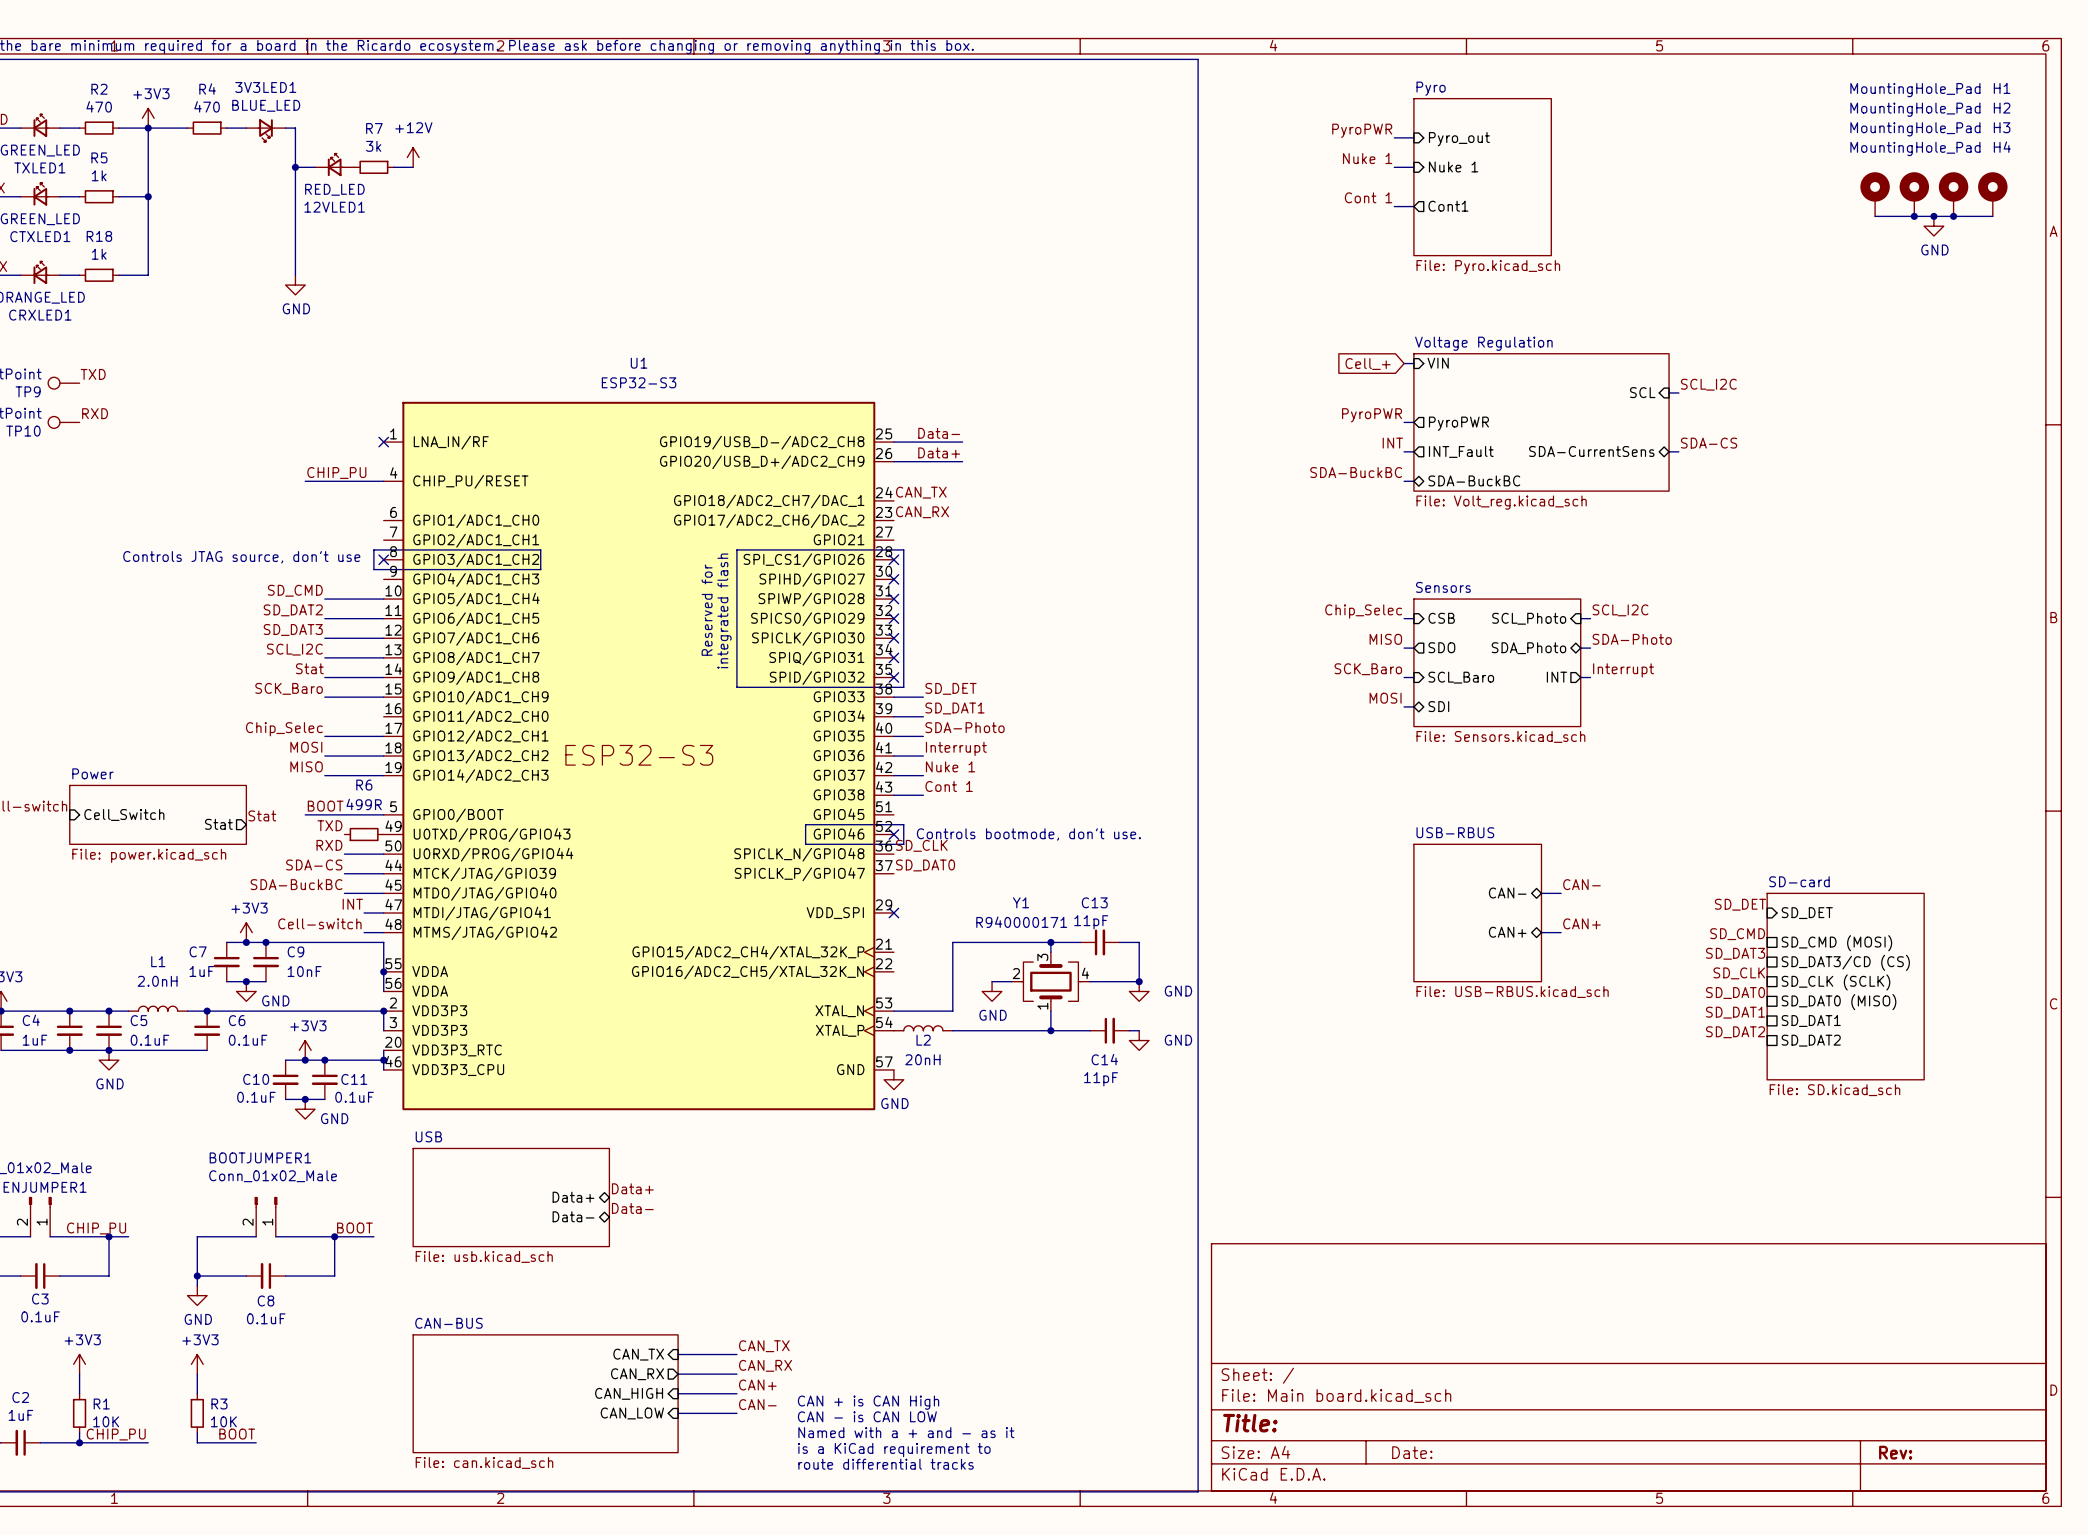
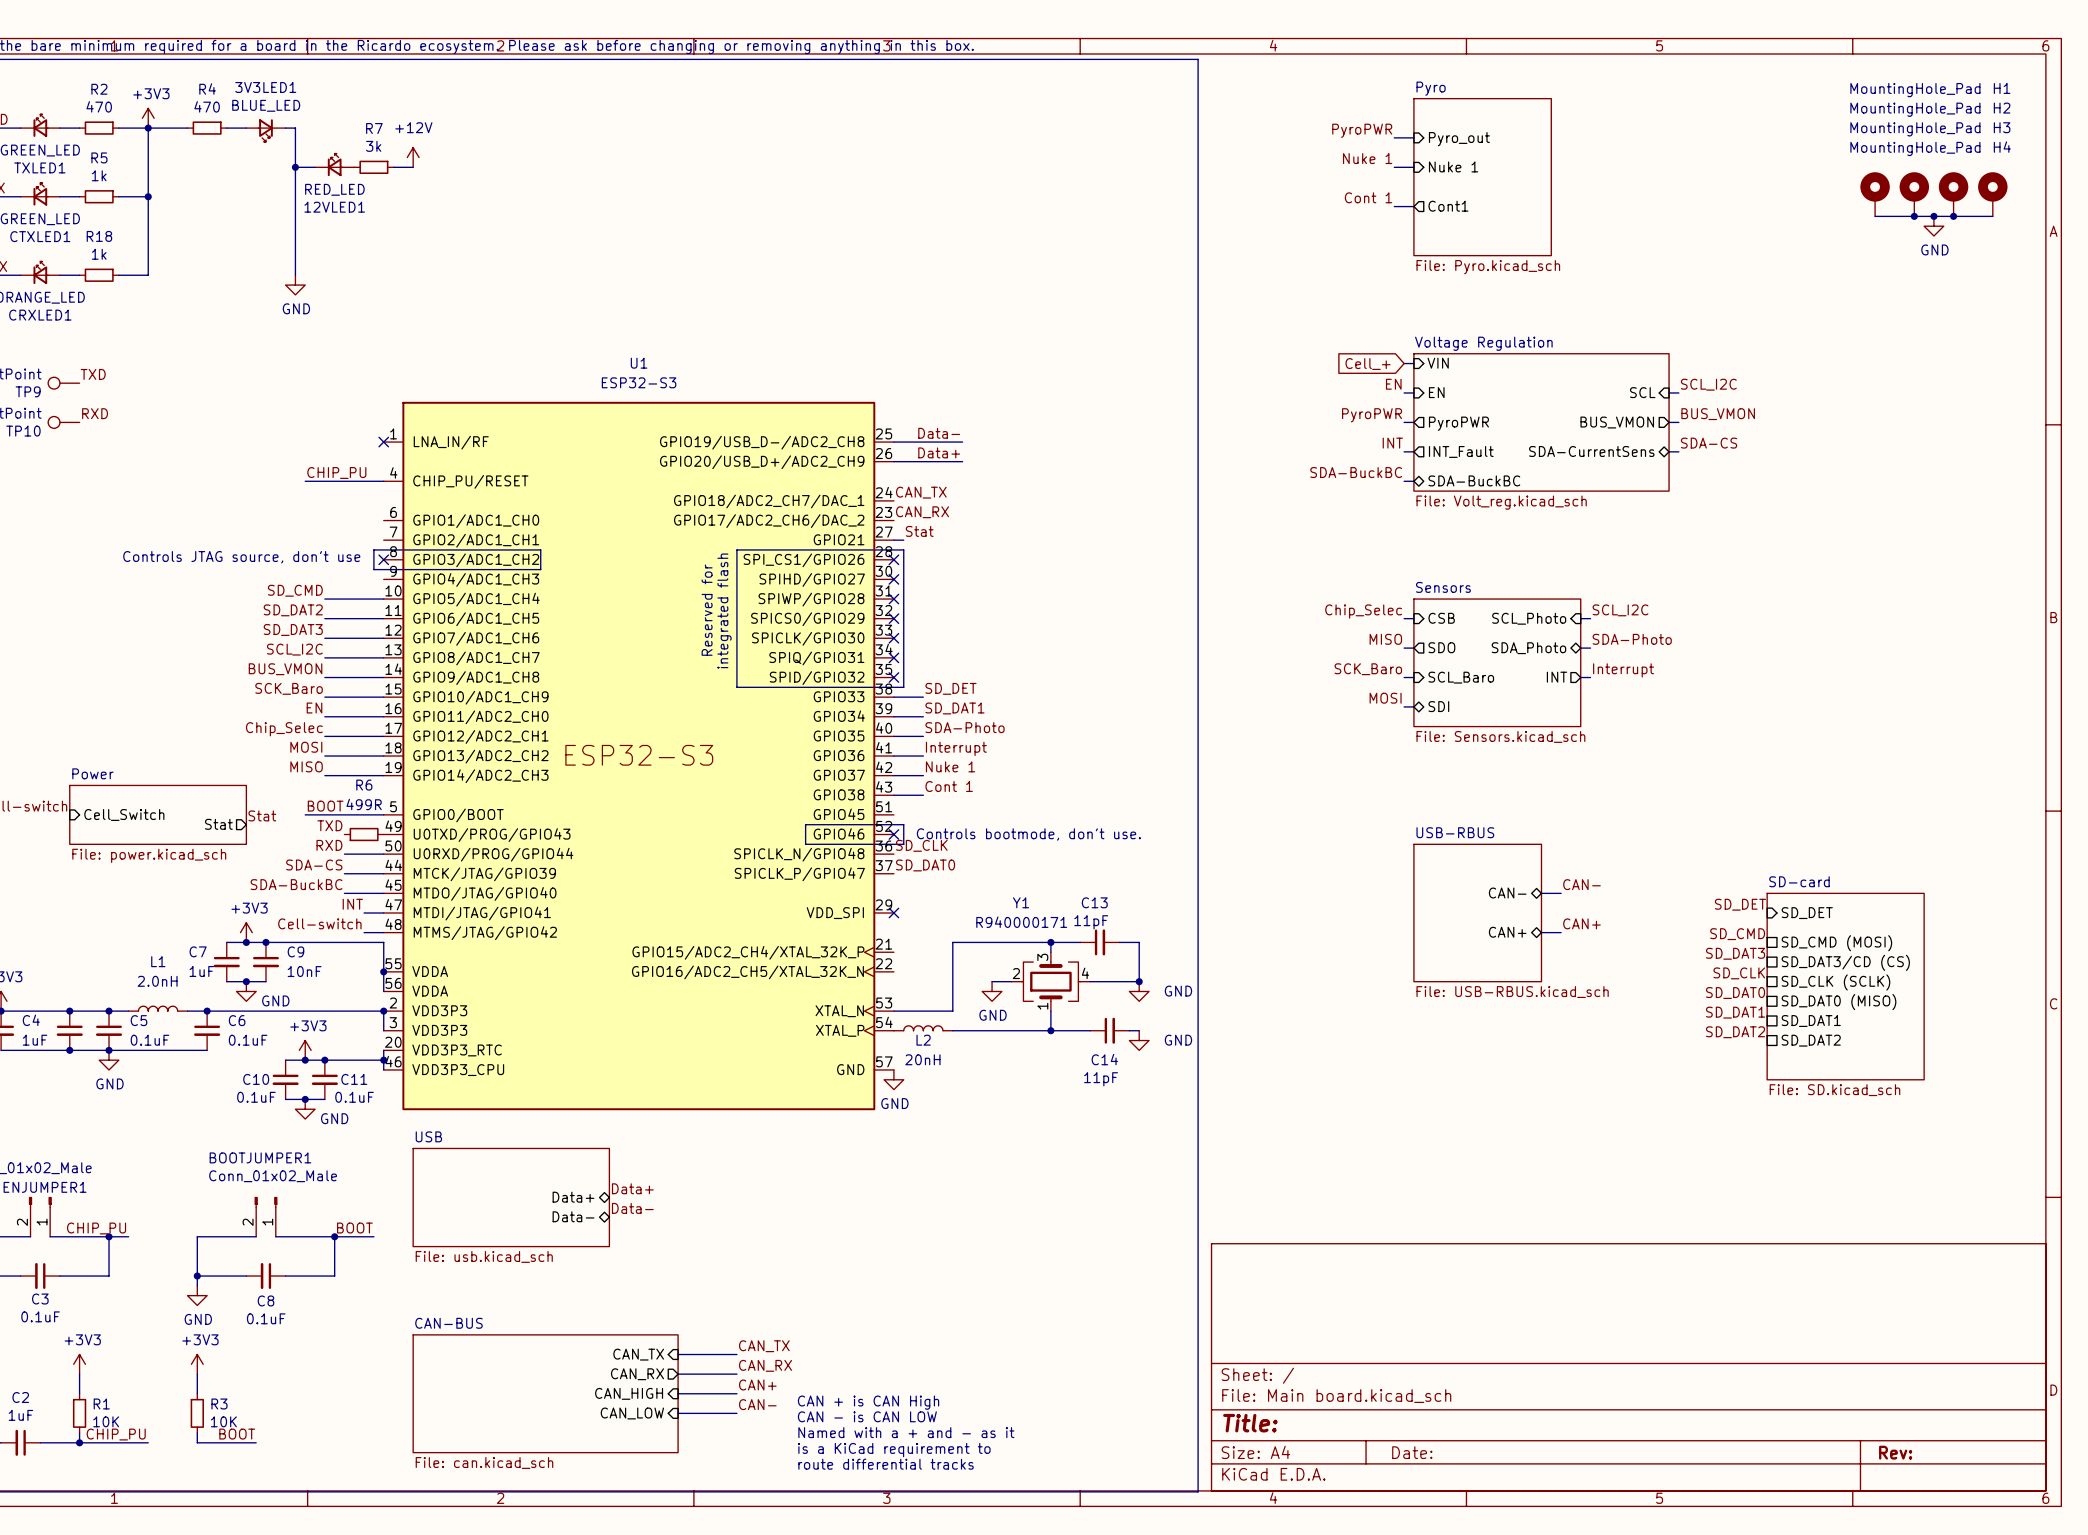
label: none -> EN (1393, 384)
wire: none -> (1404, 392) (1413, 392)
sheet pin: none -> EN (1436, 392)
label: none -> BUS_VMON (1718, 414)
sheet pin: none -> BUS_VMON (1617, 422)
wire: none -> (1669, 422) (1678, 422)
label: none -> Stat (919, 531)
wire: none -> (893, 540) (903, 540)
label: Stat (309, 668) -> BUS_VMON (285, 669)
label: none -> EN (314, 708)
wire: none -> (324, 716) (383, 716)

